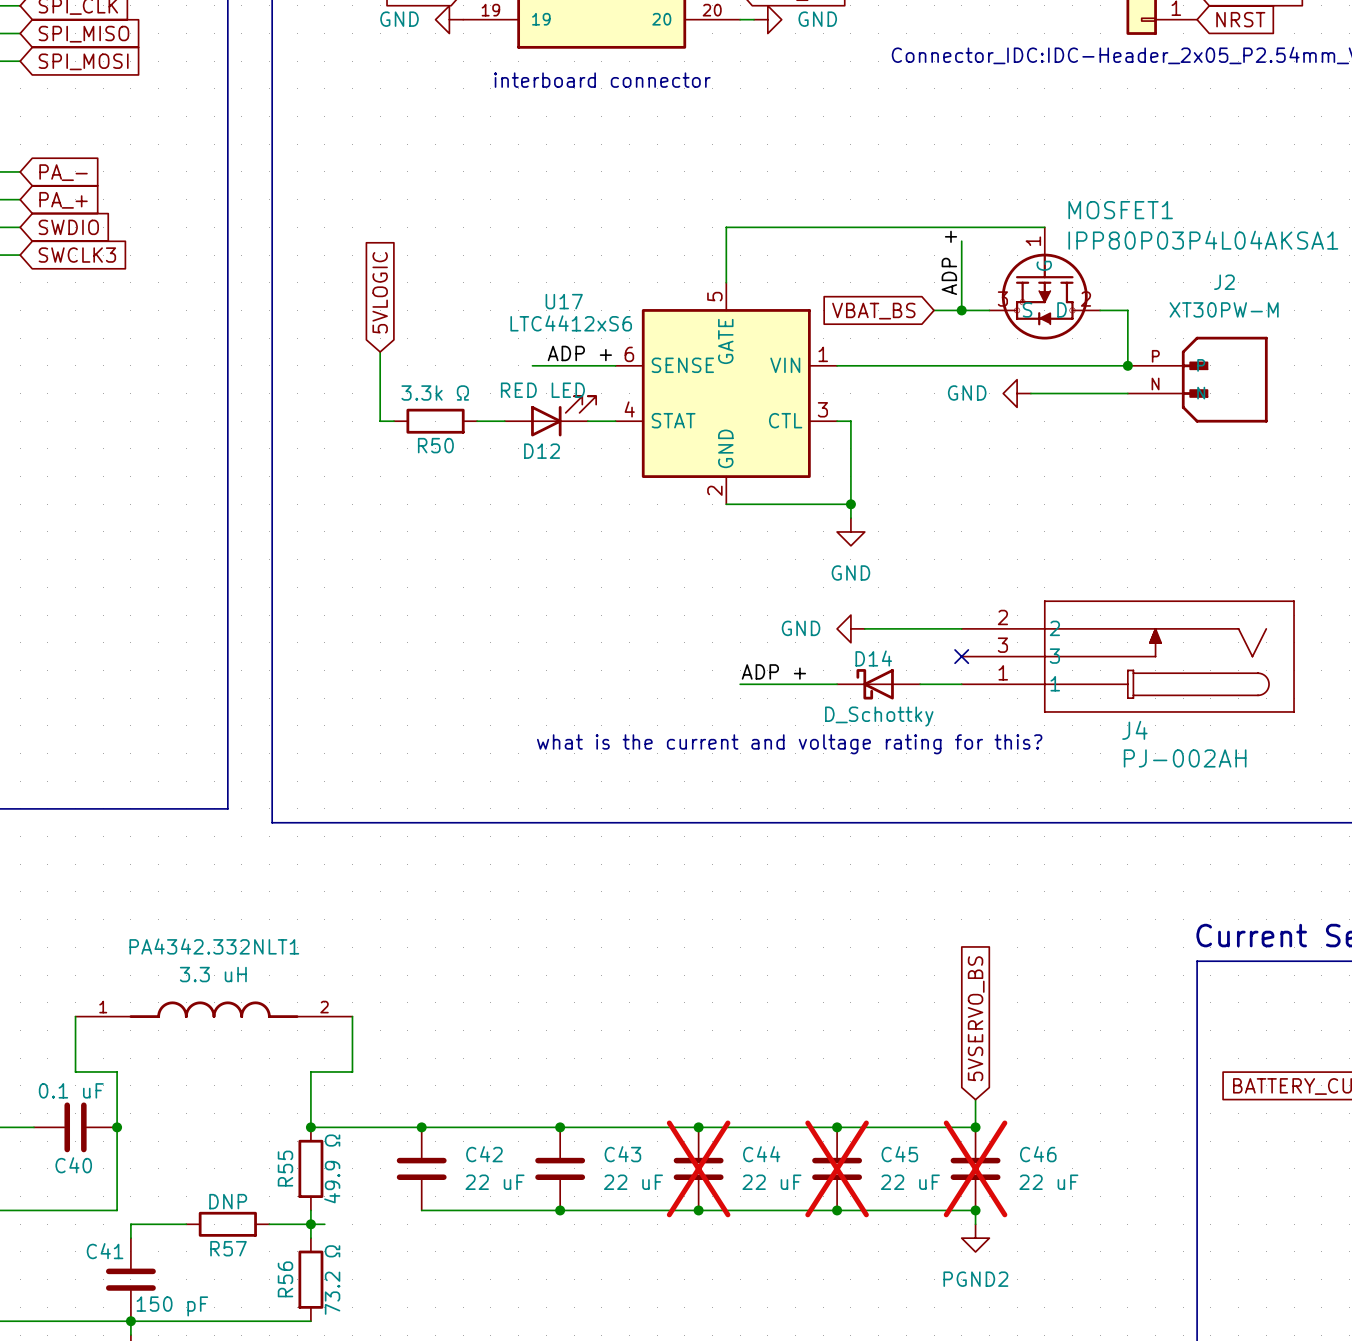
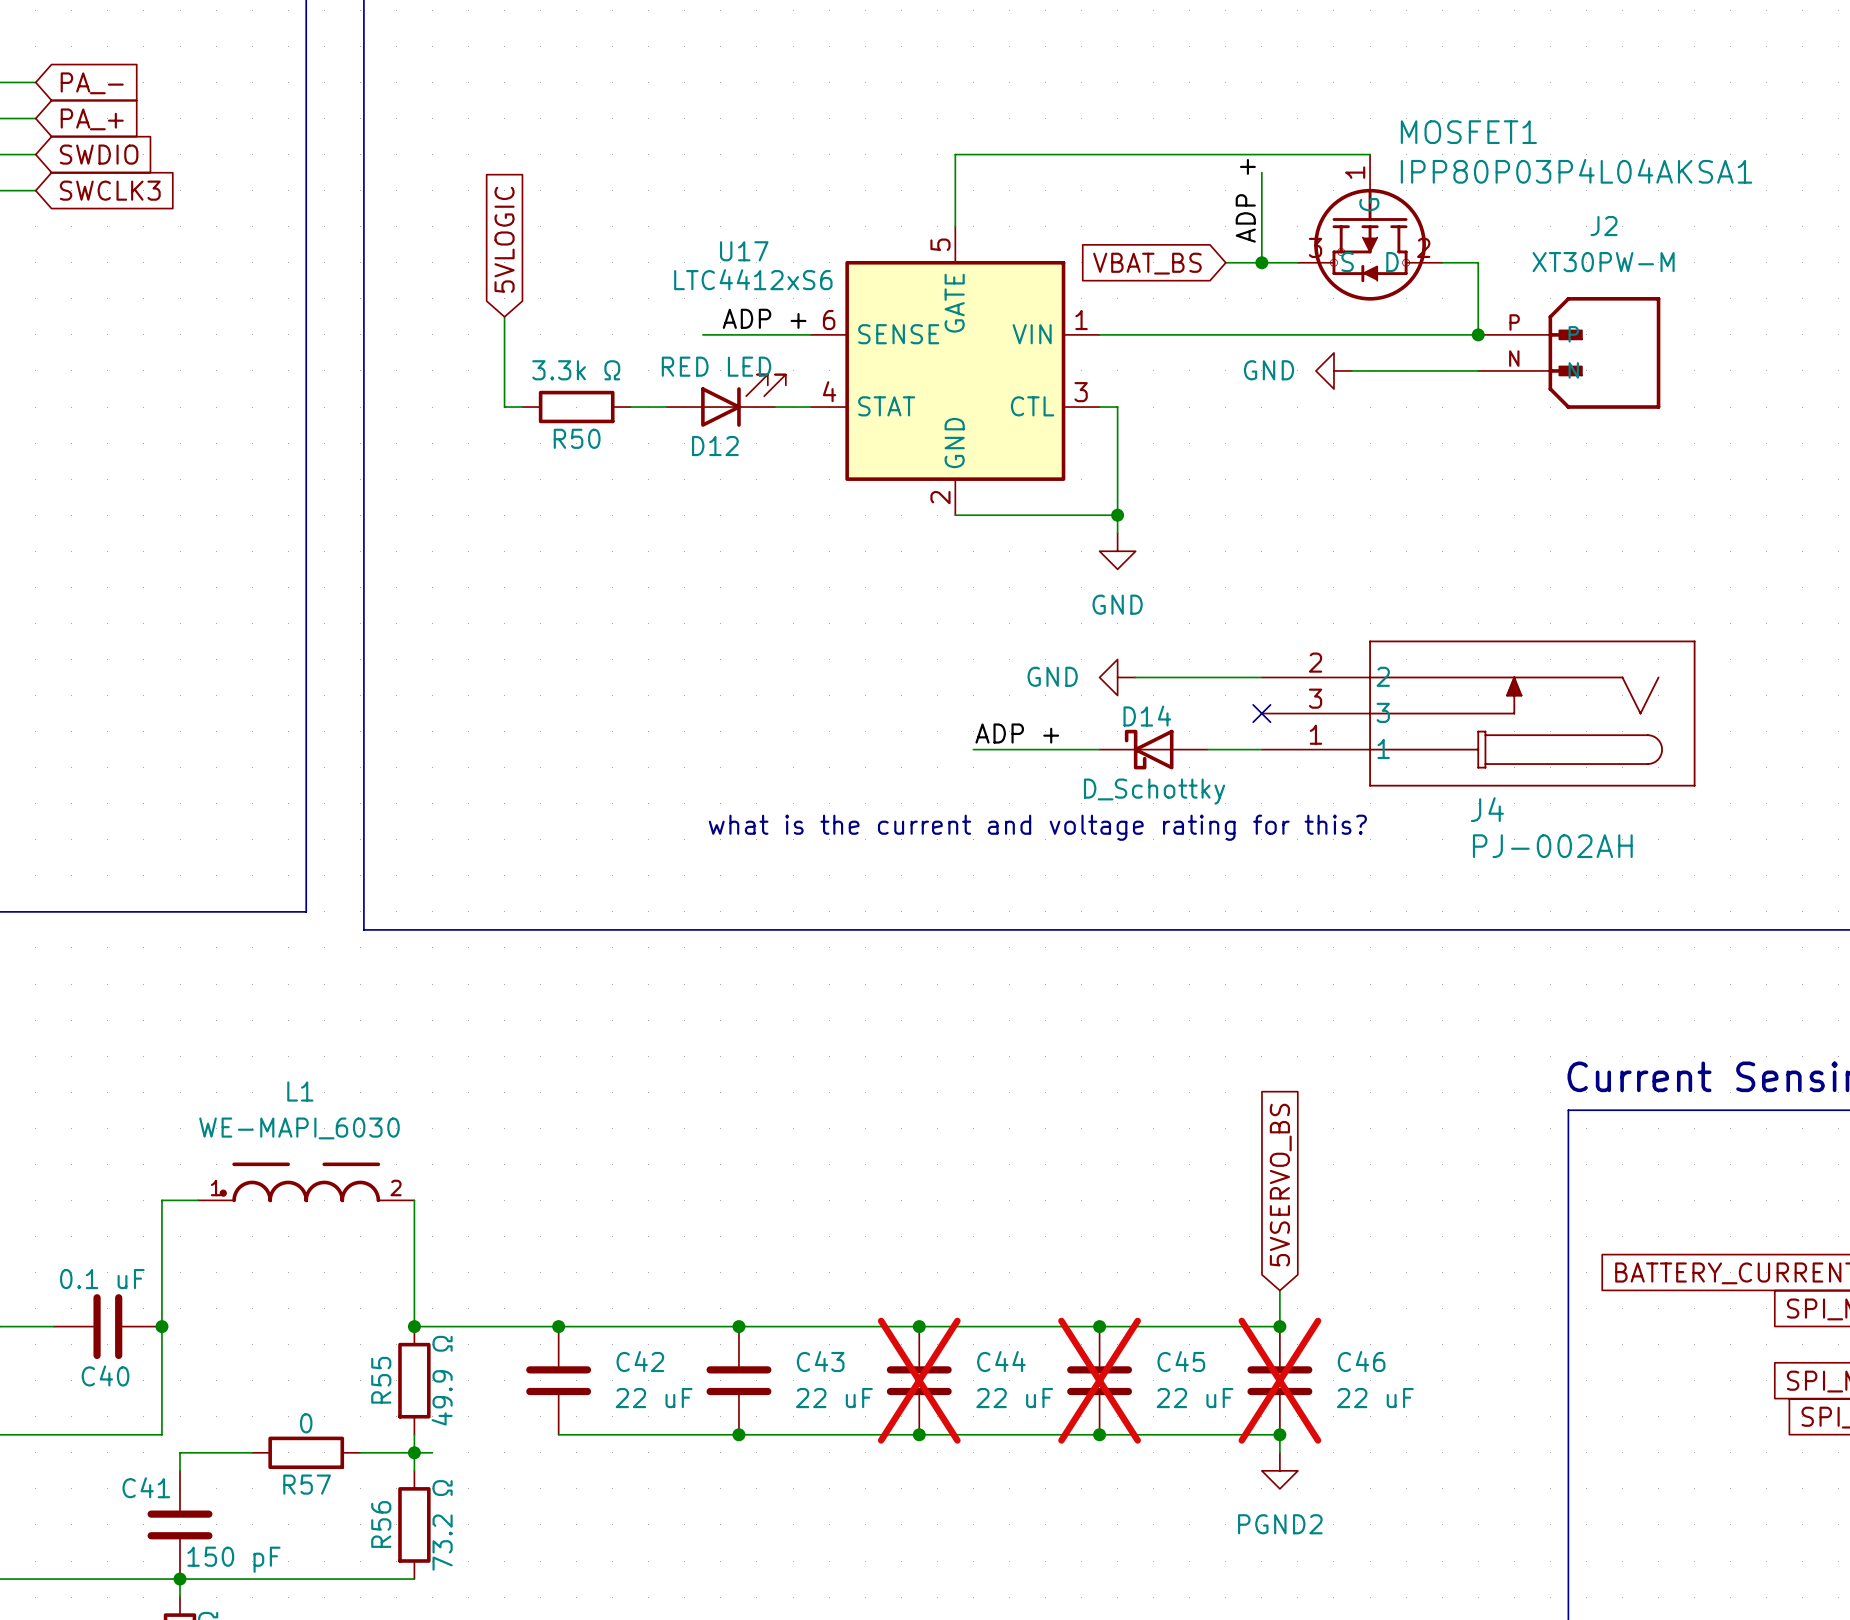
PA4342.332NLT1: 3.3 uH (214, 1009) -> none
wire: (75, 1016) (75, 1071) (117, 1071) -> (198, 1200) (161, 1200) (161, 1254)
L1: none -> WE-MAPI_6030 (306, 1182)
wire: (352, 1016) (352, 1071) (310, 1071) -> (414, 1200) (414, 1254)
R57 value: DNP (228, 1201) -> 0 (306, 1423)

